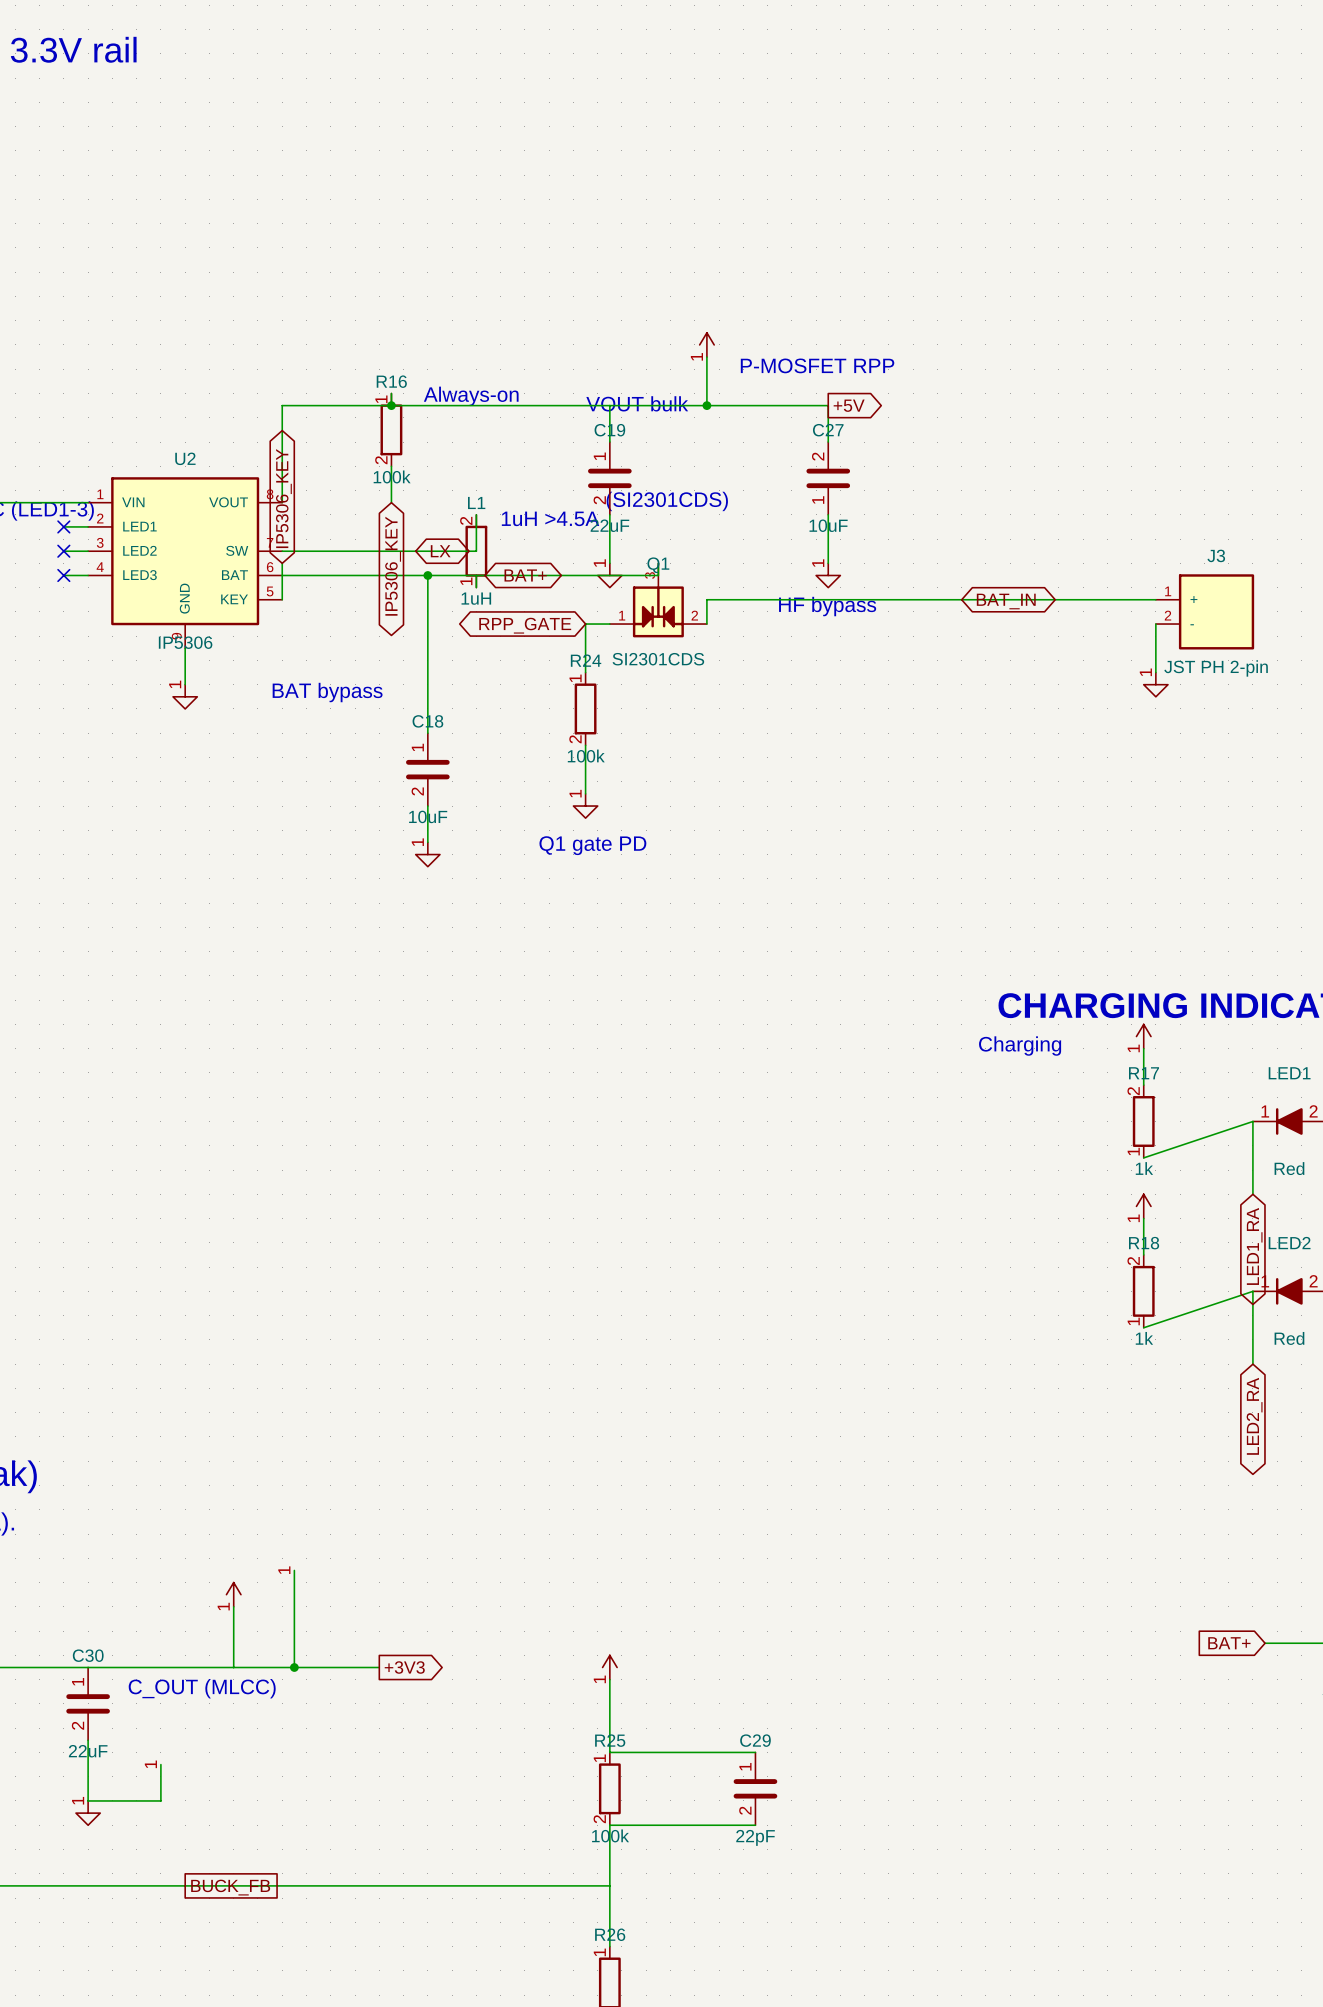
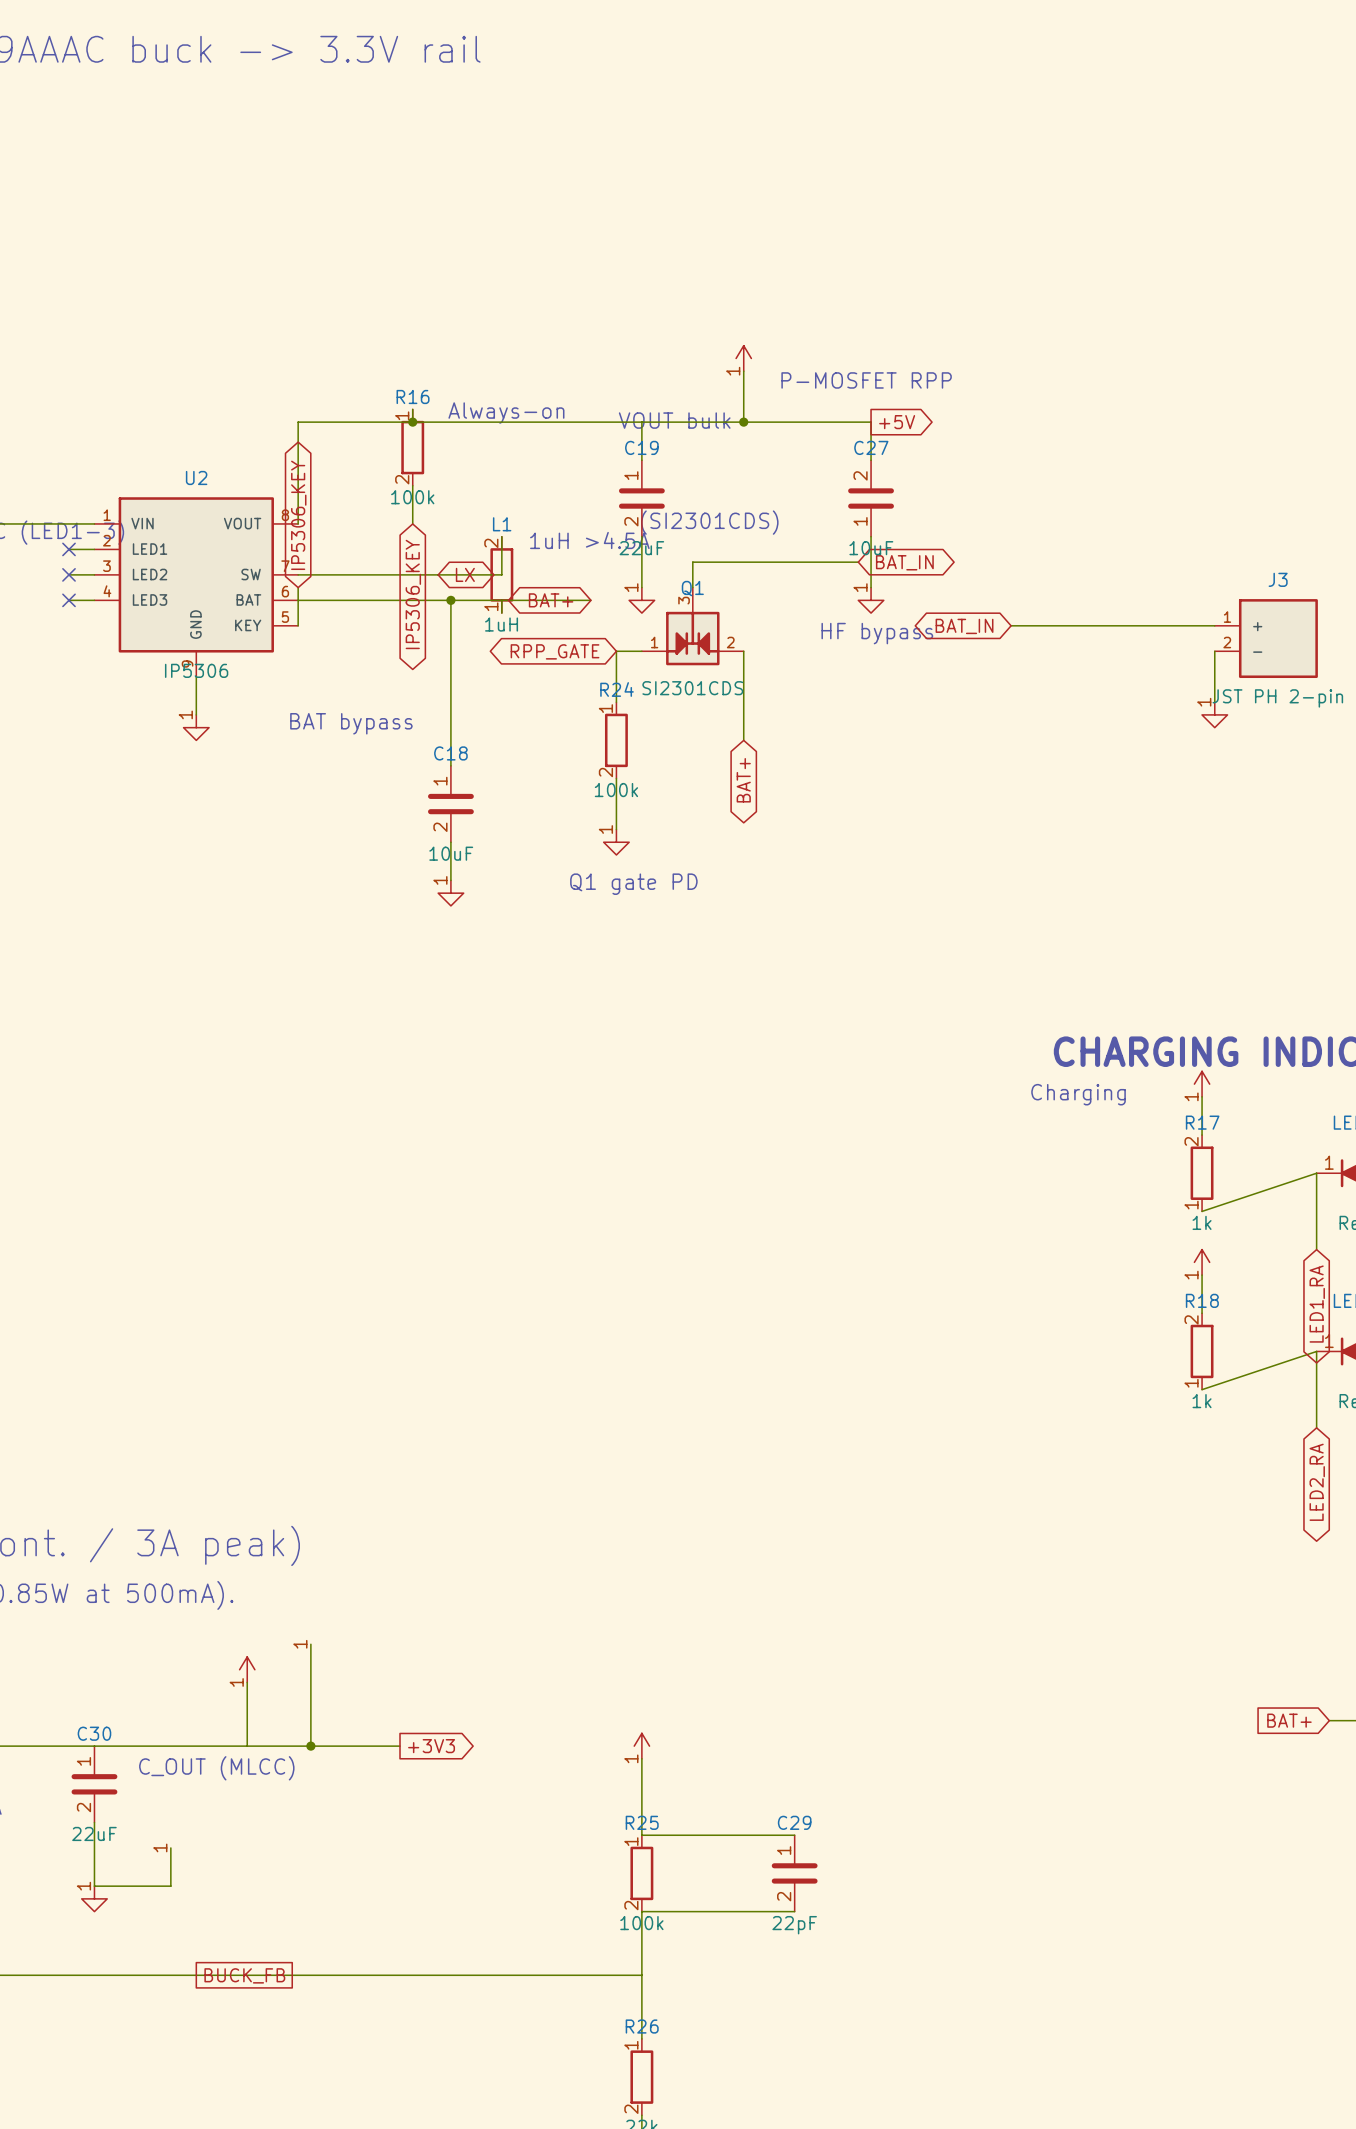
global label: none -> BAT_IN (904, 562)
wire: (658, 563) (658, 575) (561, 575) -> (692, 587) (692, 562) (858, 562)
wire: (961, 599) (706, 599) (706, 624) -> (743, 740) (743, 651)
global label rotation: 0° (1006, 601) -> 180° (964, 626)
global label: none -> BAT+ (743, 780)

